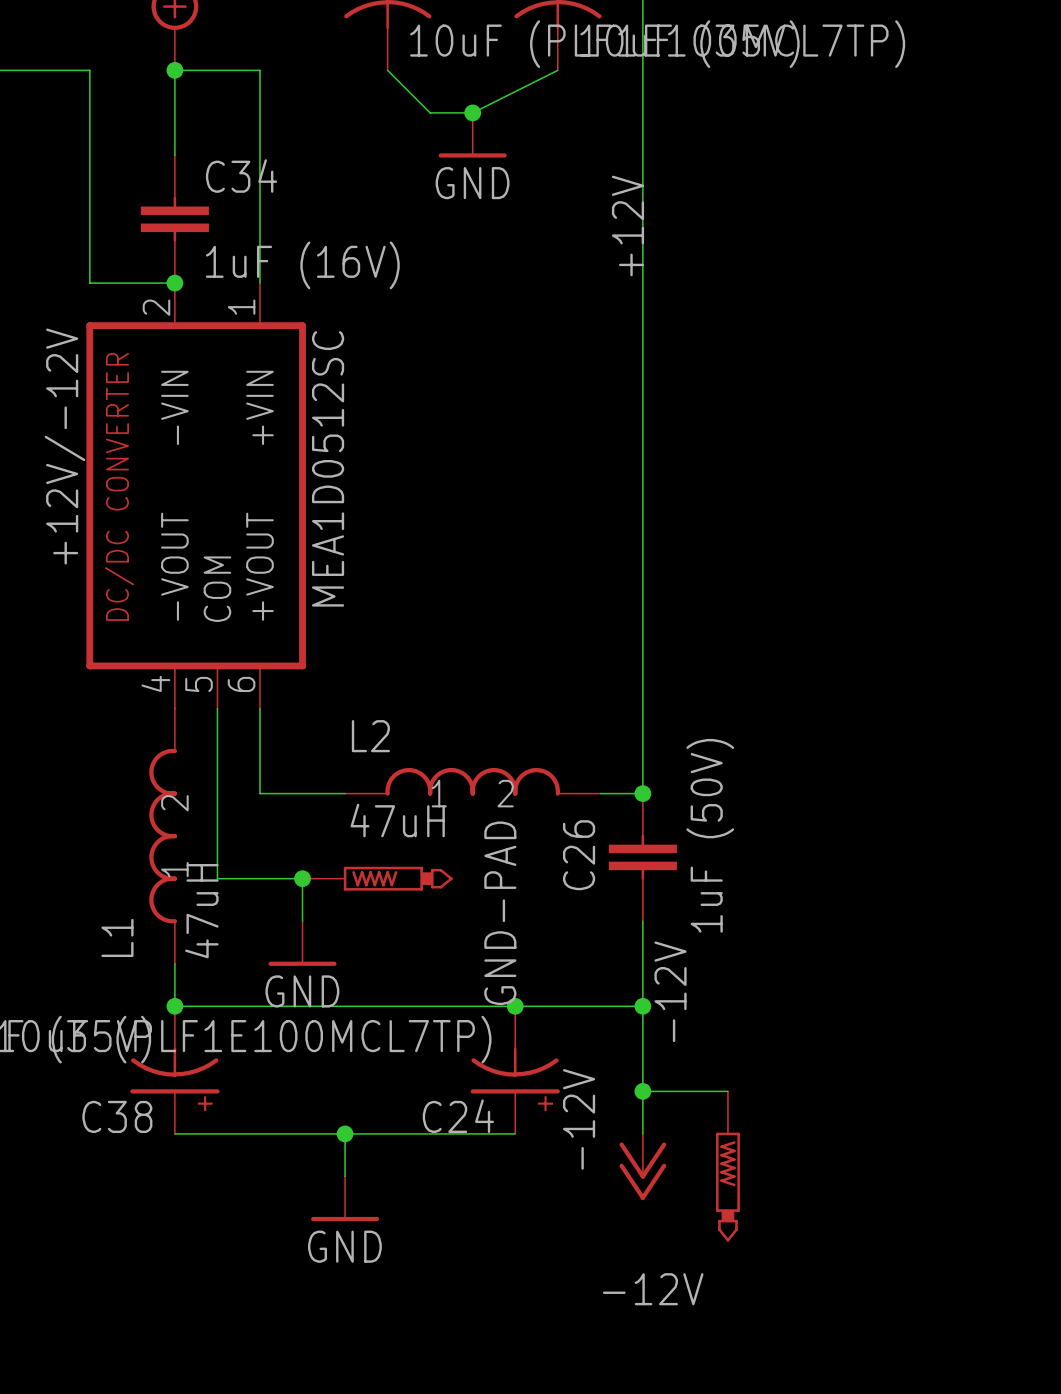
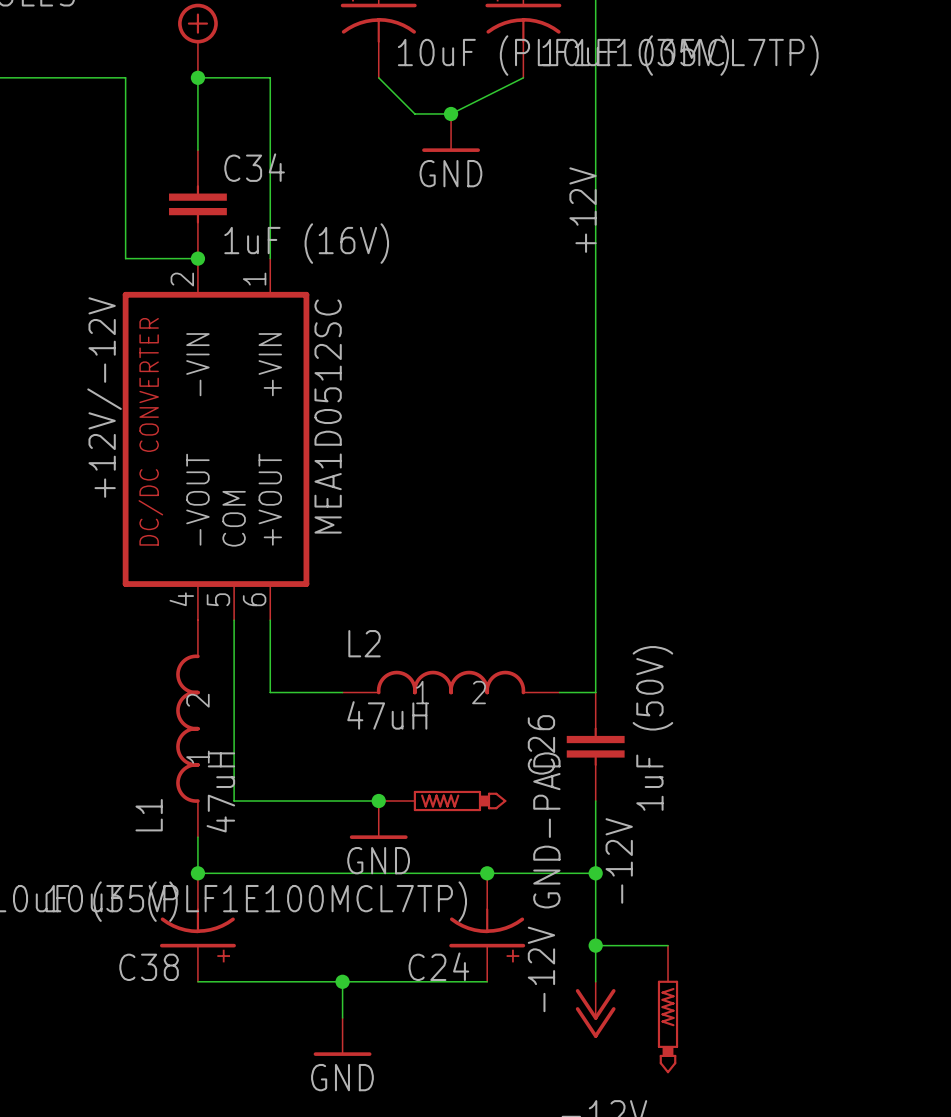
junction: (642, 793) -> none
wire: (217, 878) (302, 878) (302, 921) -> (234, 764) (234, 801) (378, 801)
junction position: (302, 878) -> (378, 801)
GND-PAD position: (377, 878) -> (442, 801)
power symbol position: GND (302, 943) -> GND (378, 819)

